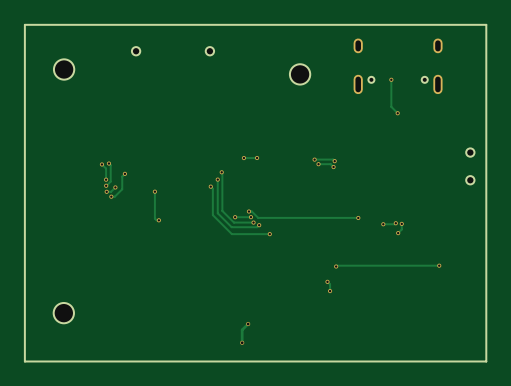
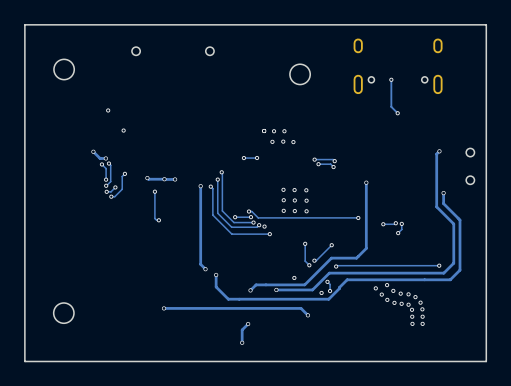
via: none -> (108, 110)
via: none -> (123, 130)
via: none -> (264, 131)
via: none -> (274, 131)
via: none -> (284, 131)
via: none -> (272, 141)
via: none -> (283, 141)
via: none -> (293, 142)
track: none -> (93, 151) (100, 158) (105, 158)
via: none -> (93, 151)
track: none -> (439, 151) (436, 154) (436, 206) (453, 223) (453, 263) (443, 273) (329, 273) (312, 289) (276, 289)
via: none -> (439, 151)
via: none -> (105, 158)
track: none -> (147, 178) (175, 179)
via: none -> (147, 178)
via: none -> (164, 179)
via: none -> (175, 179)
track: none -> (366, 182) (366, 248) (356, 258) (331, 258) (304, 284) (256, 284) (250, 290)
via: none -> (366, 182)
track: none -> (200, 186) (200, 264) (205, 269)
via: none -> (200, 186)
via: none -> (283, 189)
via: none -> (294, 190)
via: none -> (306, 190)
track: none -> (443, 193) (443, 203) (460, 220) (460, 270) (450, 279) (347, 279) (328, 299) (228, 299) (216, 286) (216, 274)
via: none -> (443, 193)
via: none -> (283, 200)
via: none -> (294, 200)
via: none -> (306, 200)
via: none -> (283, 210)
via: none -> (294, 211)
via: none -> (306, 211)
via: none -> (264, 226)
track: none -> (305, 243) (305, 261) (309, 265)
via: none -> (305, 243)
track: none -> (331, 245) (314, 260)
via: none -> (331, 245)
via: none -> (314, 260)
via: none -> (309, 265)
via: none -> (205, 269)
via: none -> (216, 274)
via: none -> (294, 277)
via: none -> (387, 285)
via: none -> (375, 288)
via: none -> (276, 289)
via: none -> (250, 290)
via: none -> (393, 290)
via: none -> (321, 292)
via: none -> (400, 293)
via: none -> (381, 294)
via: none -> (408, 294)
via: none -> (415, 297)
via: none -> (387, 299)
via: none -> (394, 302)
via: none -> (420, 302)
via: none -> (401, 303)
via: none -> (408, 304)
track: none -> (164, 308) (301, 308) (307, 315)
via: none -> (164, 308)
via: none -> (412, 309)
via: none -> (422, 309)
via: none -> (307, 315)
via: none -> (412, 316)
via: none -> (422, 316)
via: none -> (412, 323)
via: none -> (422, 323)

